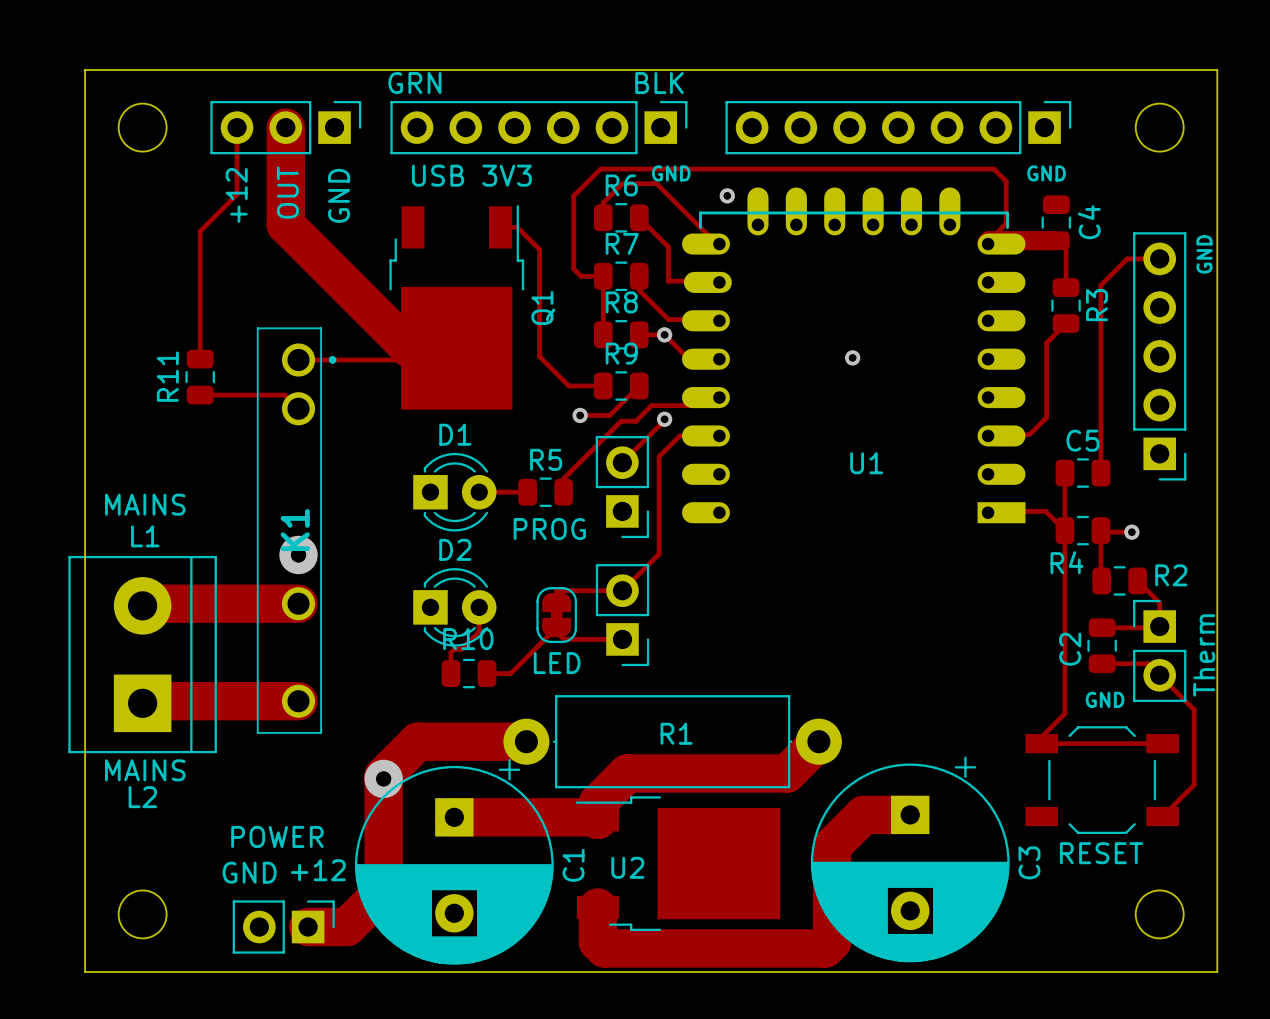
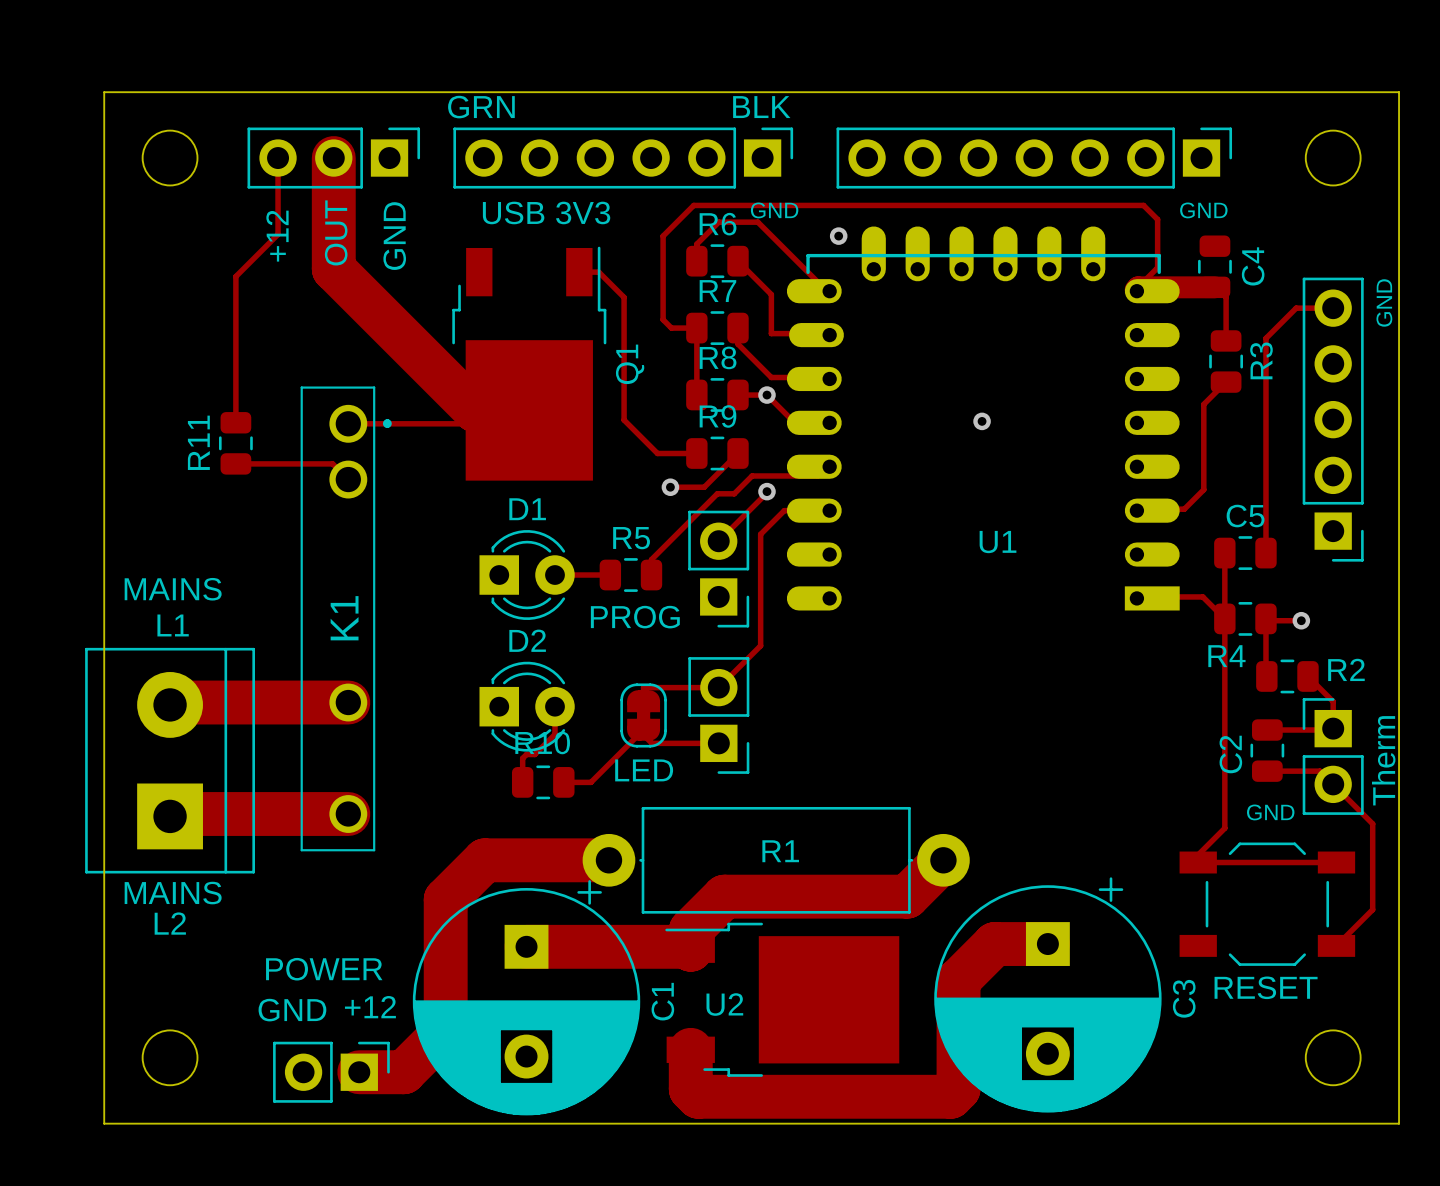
via: (298, 554) -> none
via: (383, 778) -> none

